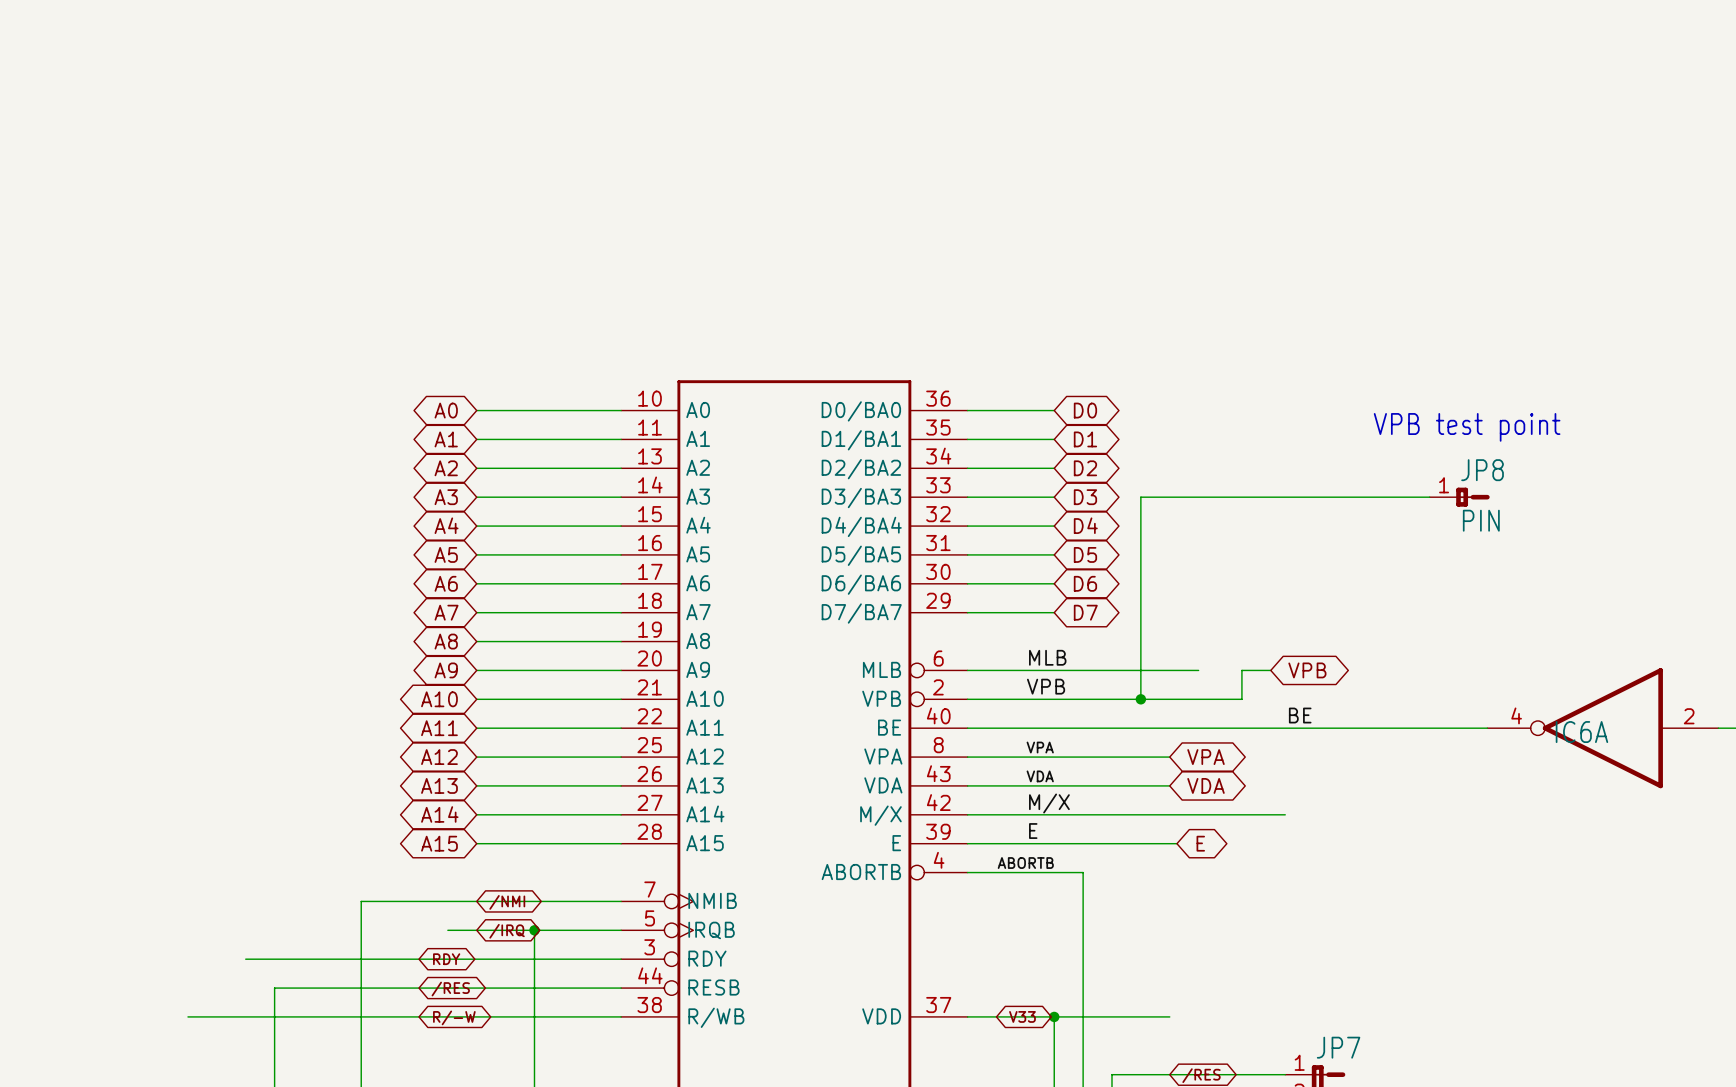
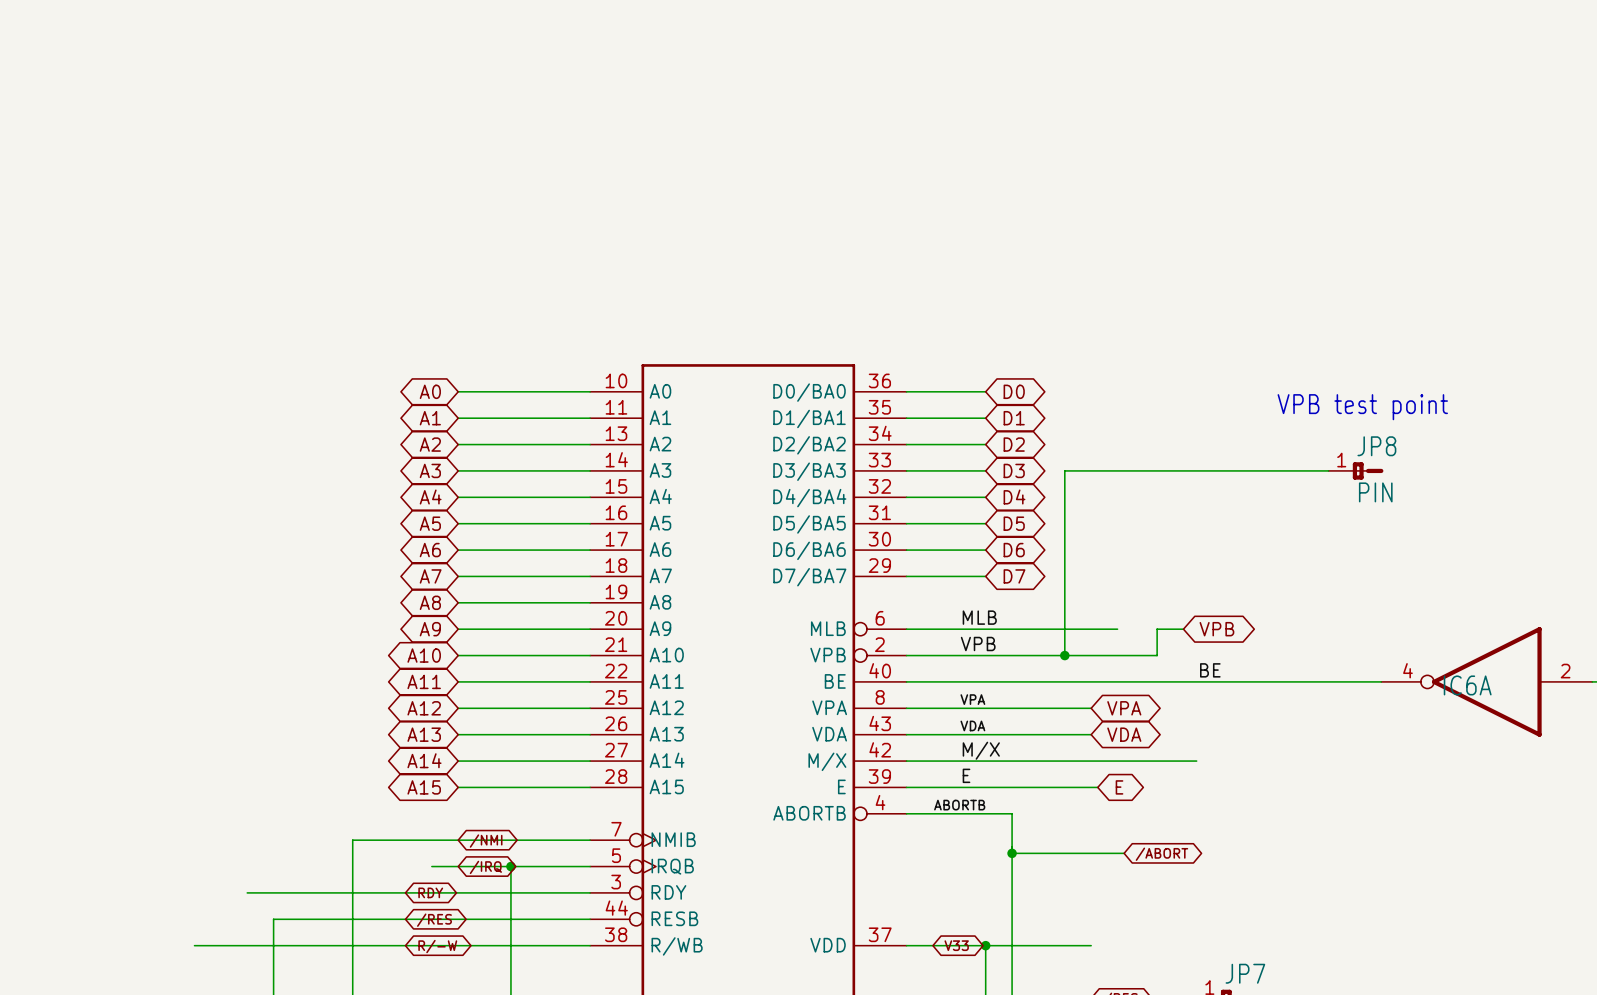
wire: none -> (1012, 853) (1124, 853)
junction: none -> (1012, 853)
global label: none -> /ABORT (1161, 854)

